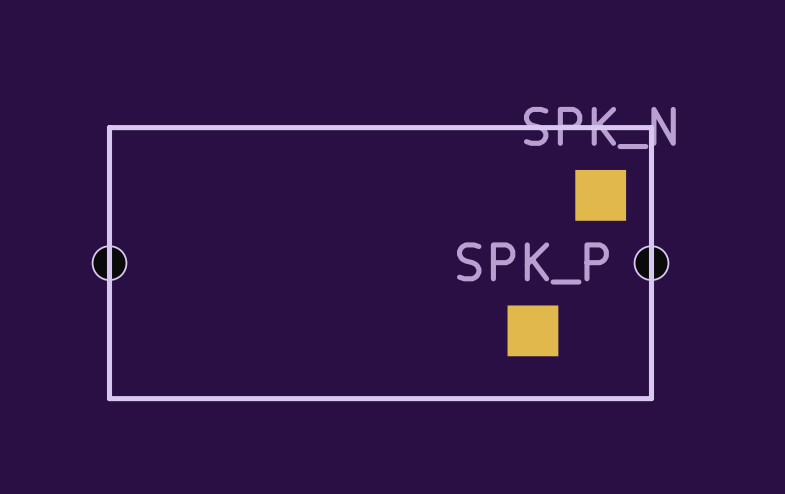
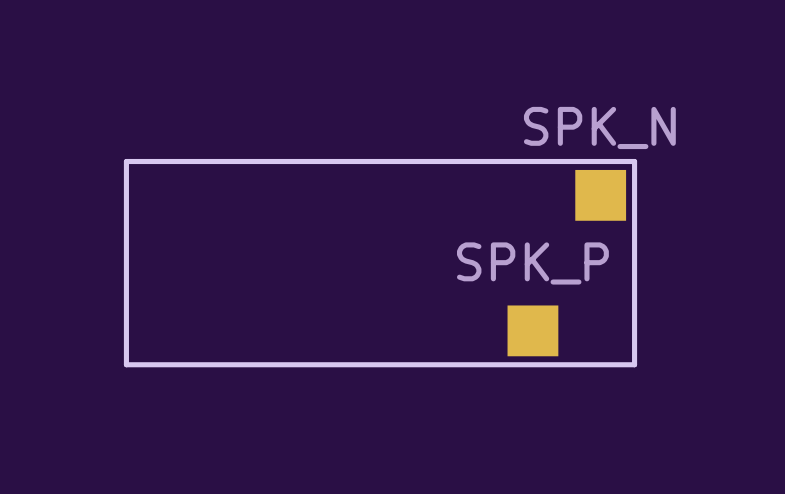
board edge: (651, 127) (109, 127) (109, 398) (651, 398) (651, 127) -> (634, 161) (634, 364) (126, 364) (126, 161) (634, 161)
part: (109, 263) -> none
part: (651, 263) -> none

